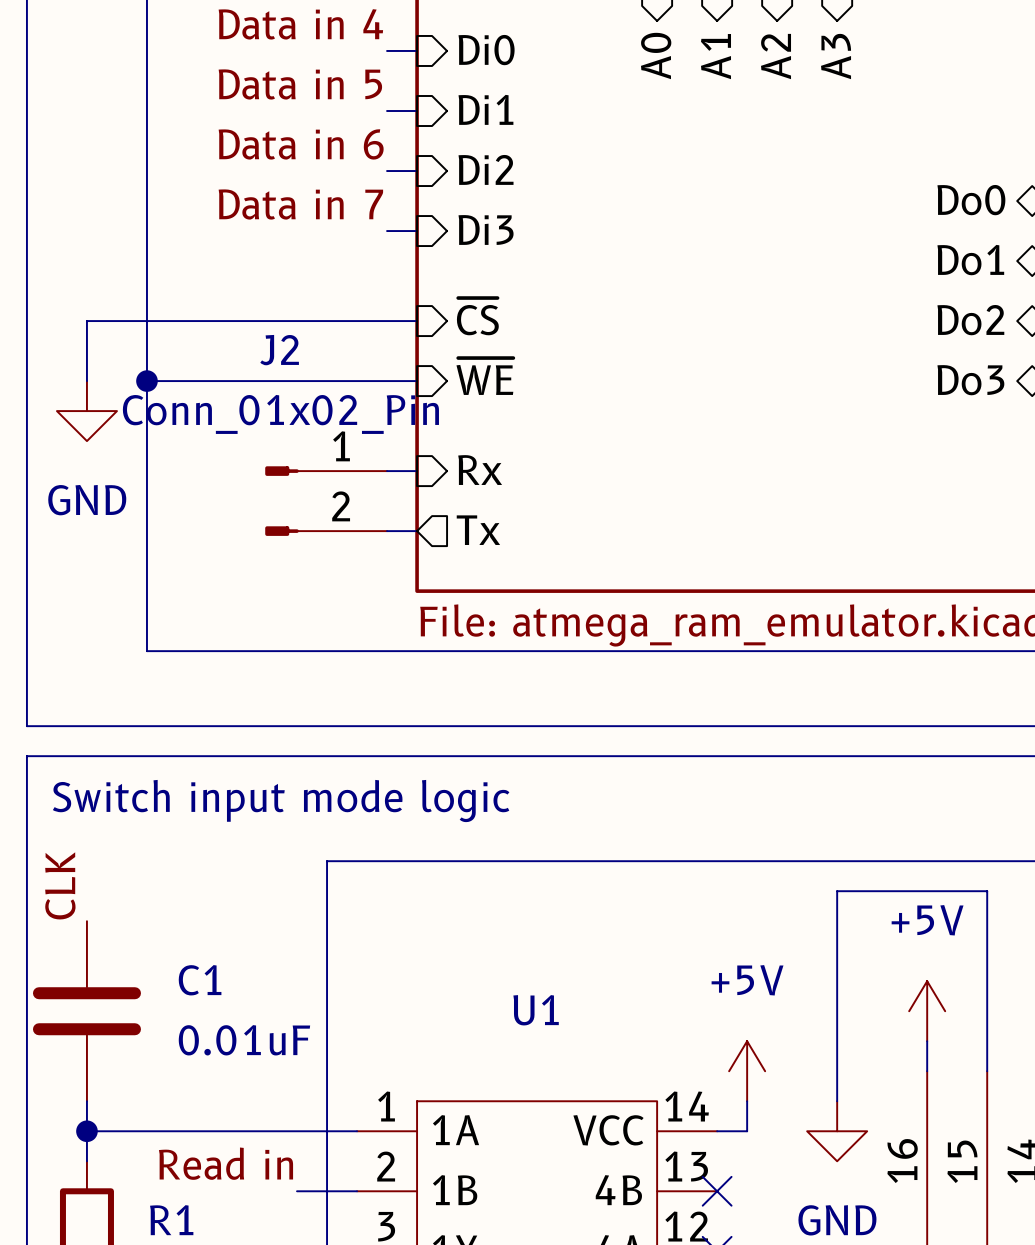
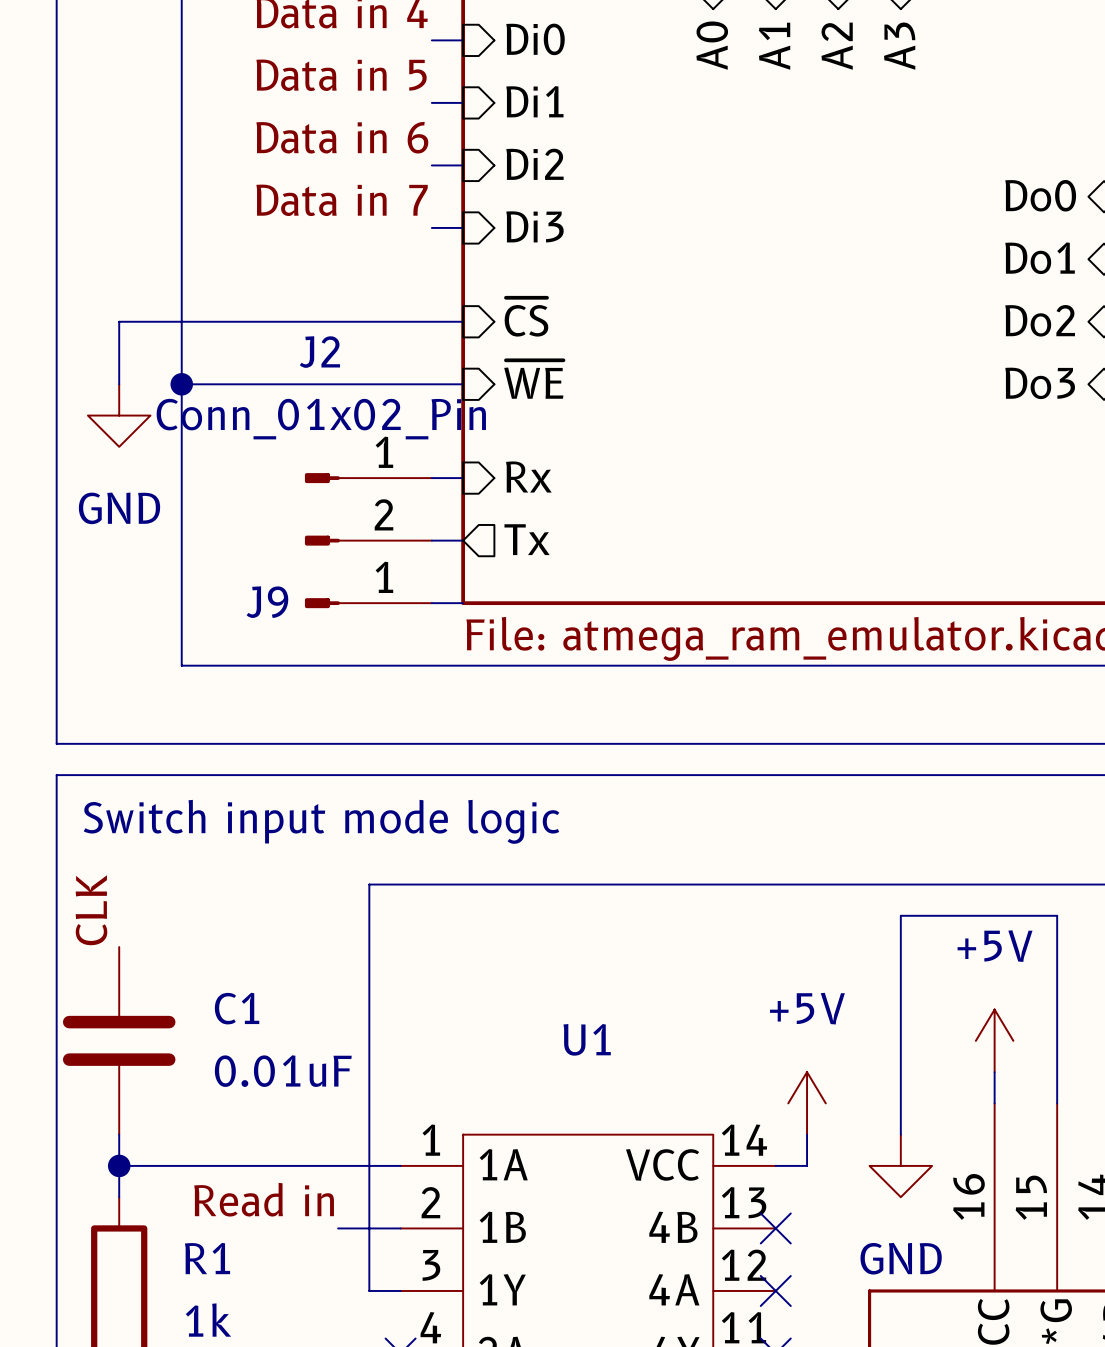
J9: none -> (368, 603)
wire: none -> (431, 603) (463, 603)

